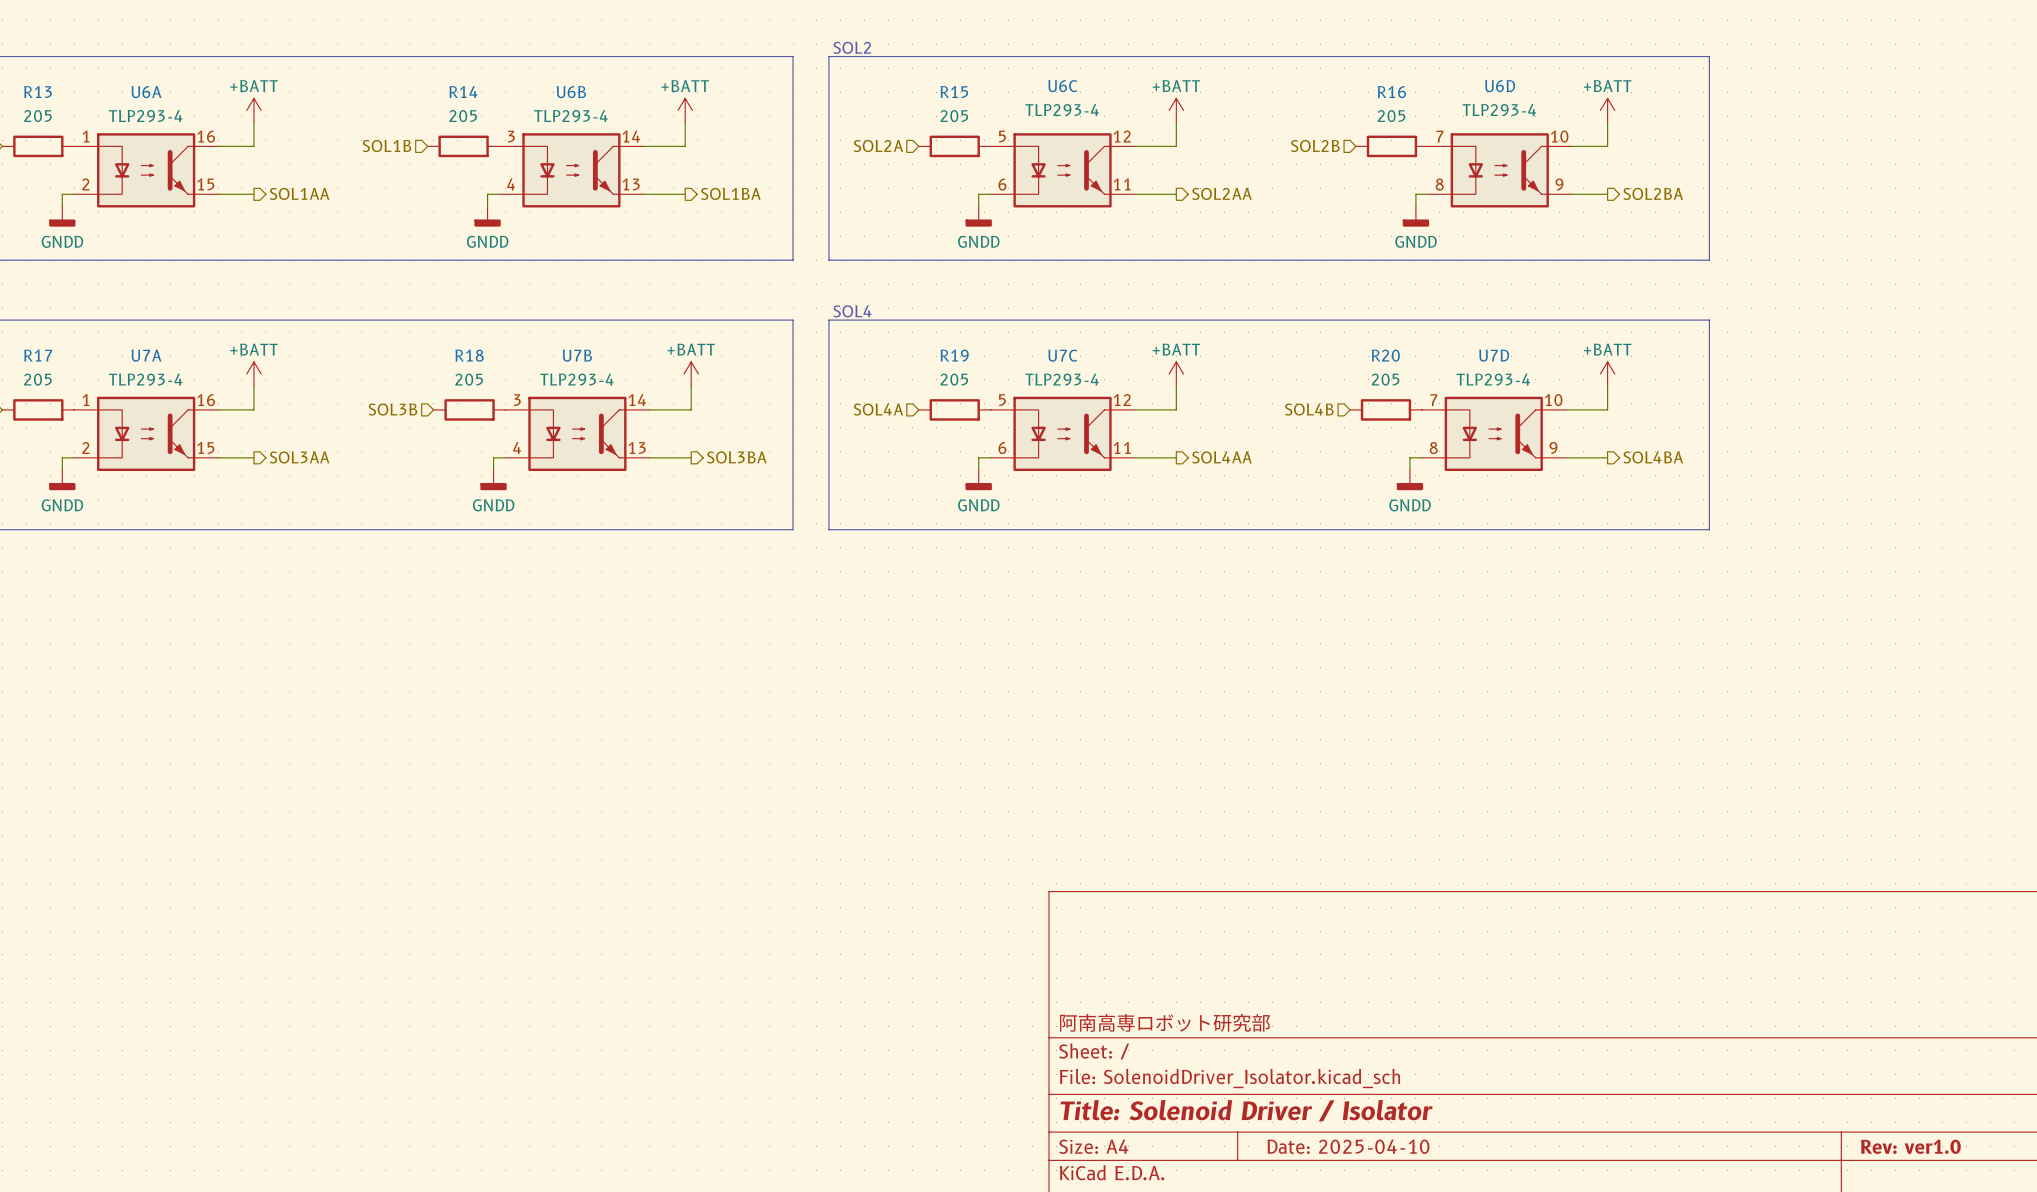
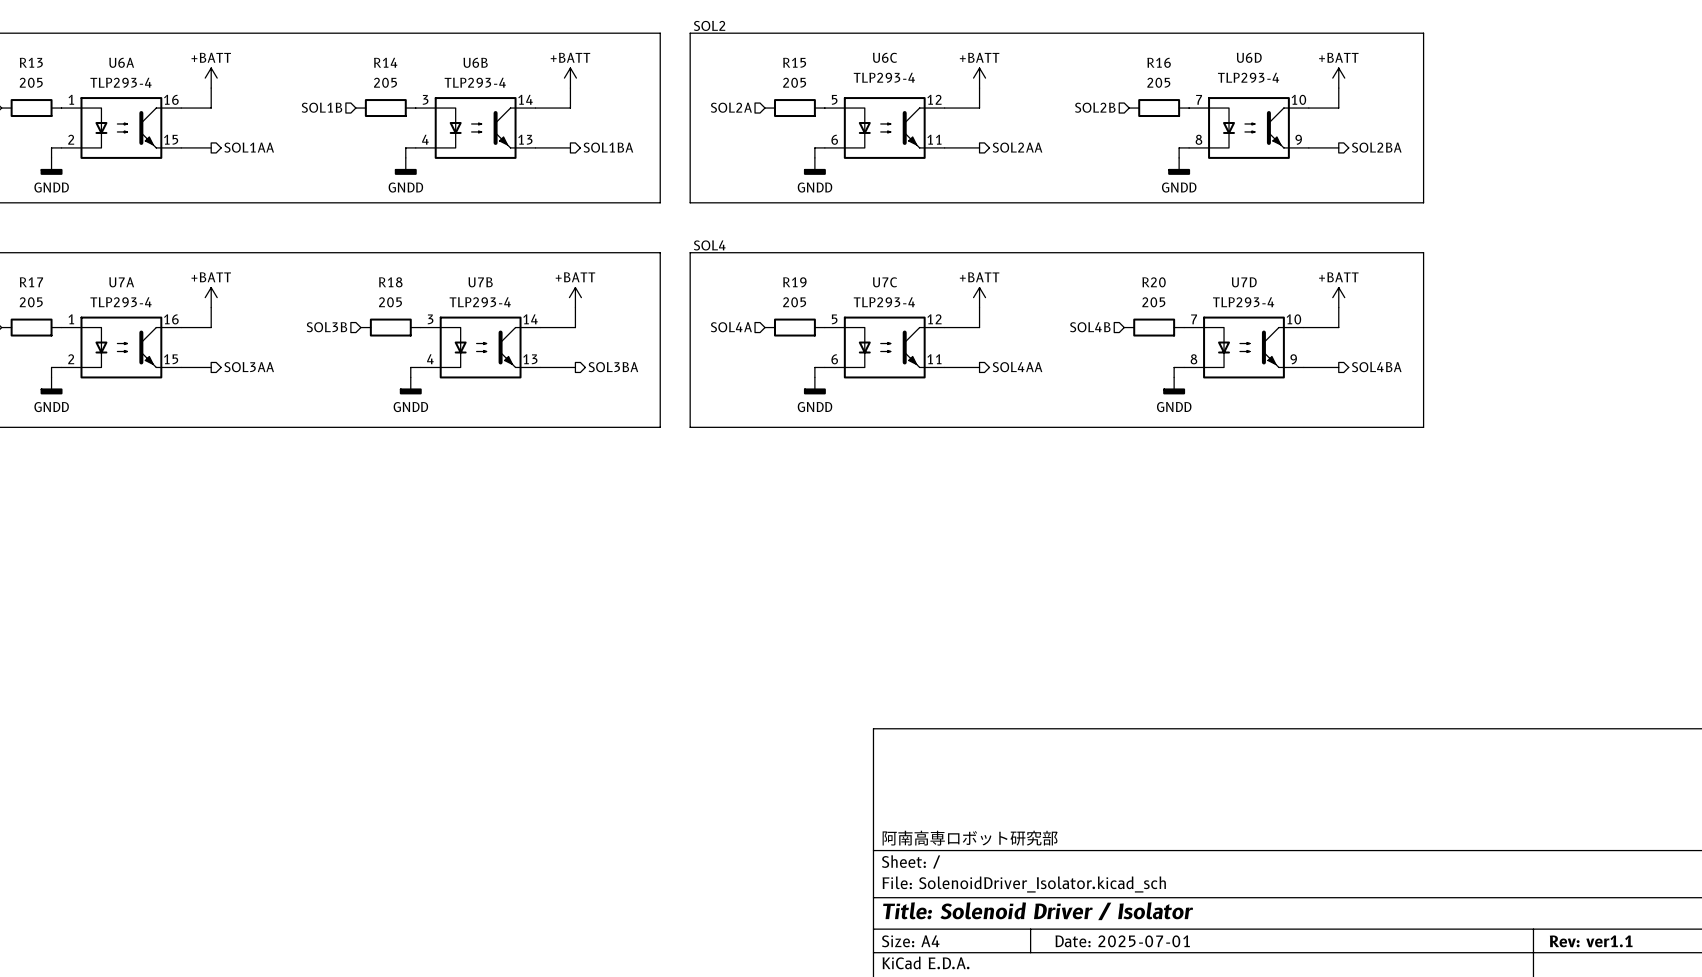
title block: Date: 2025-04-10 (1348, 1146) -> Date: 2025-07-01 (1122, 941)
title block: Rev: ver1.0 (1910, 1146) -> Rev: ver1.1 (1591, 941)

